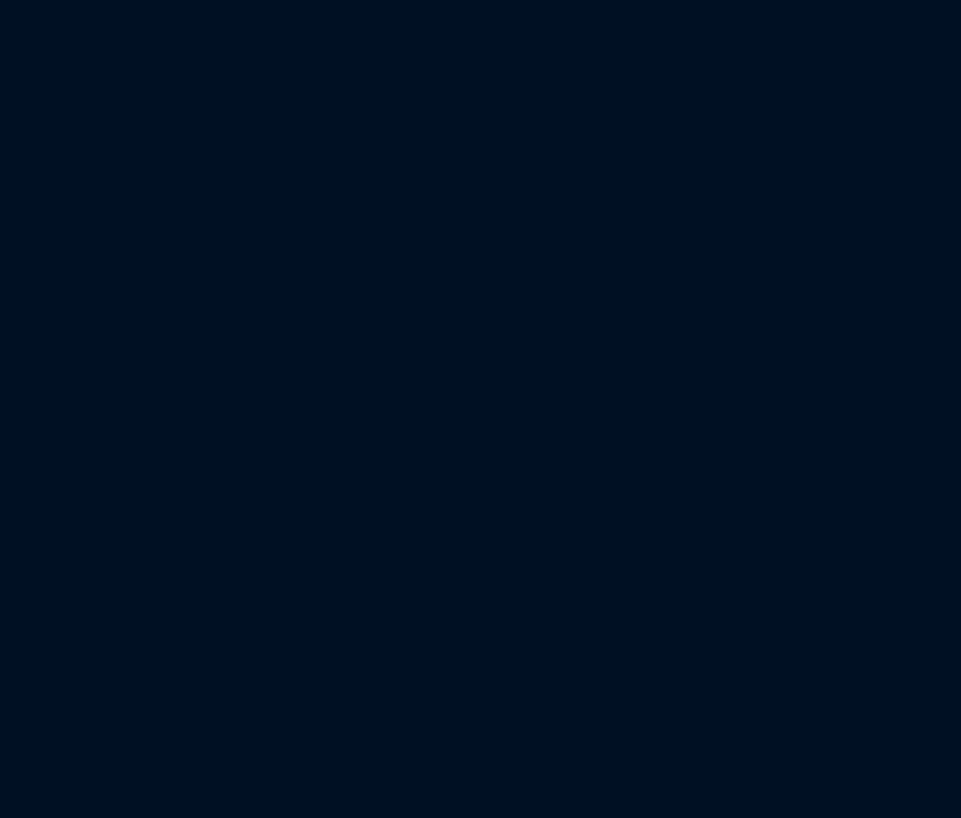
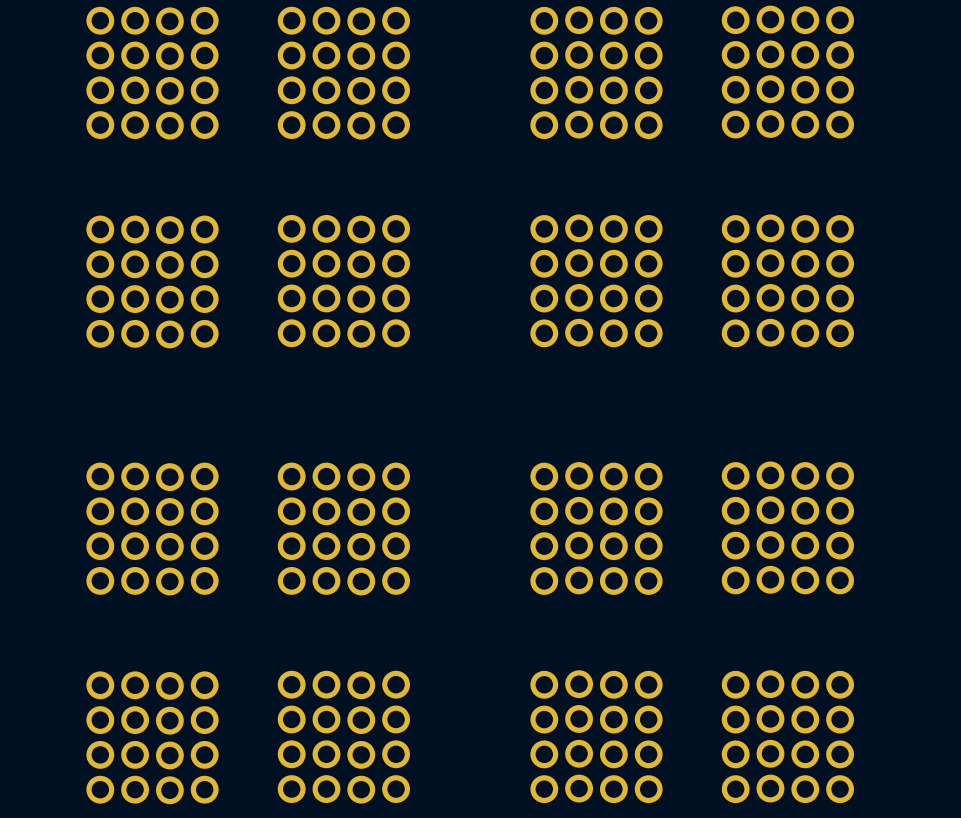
part: none -> (692, 176)
part: none -> (248, 177)
part: none -> (692, 632)
part: none -> (248, 633)

